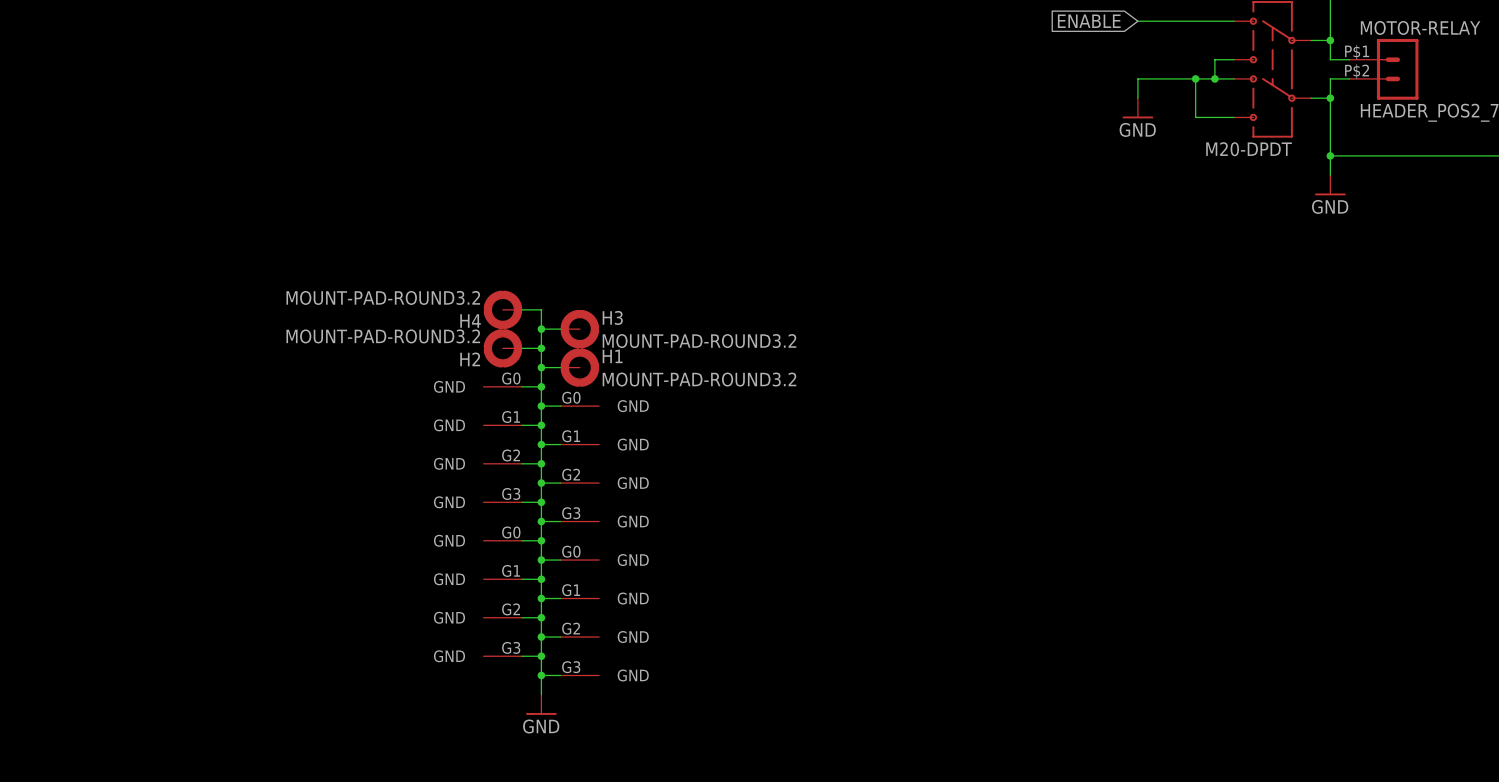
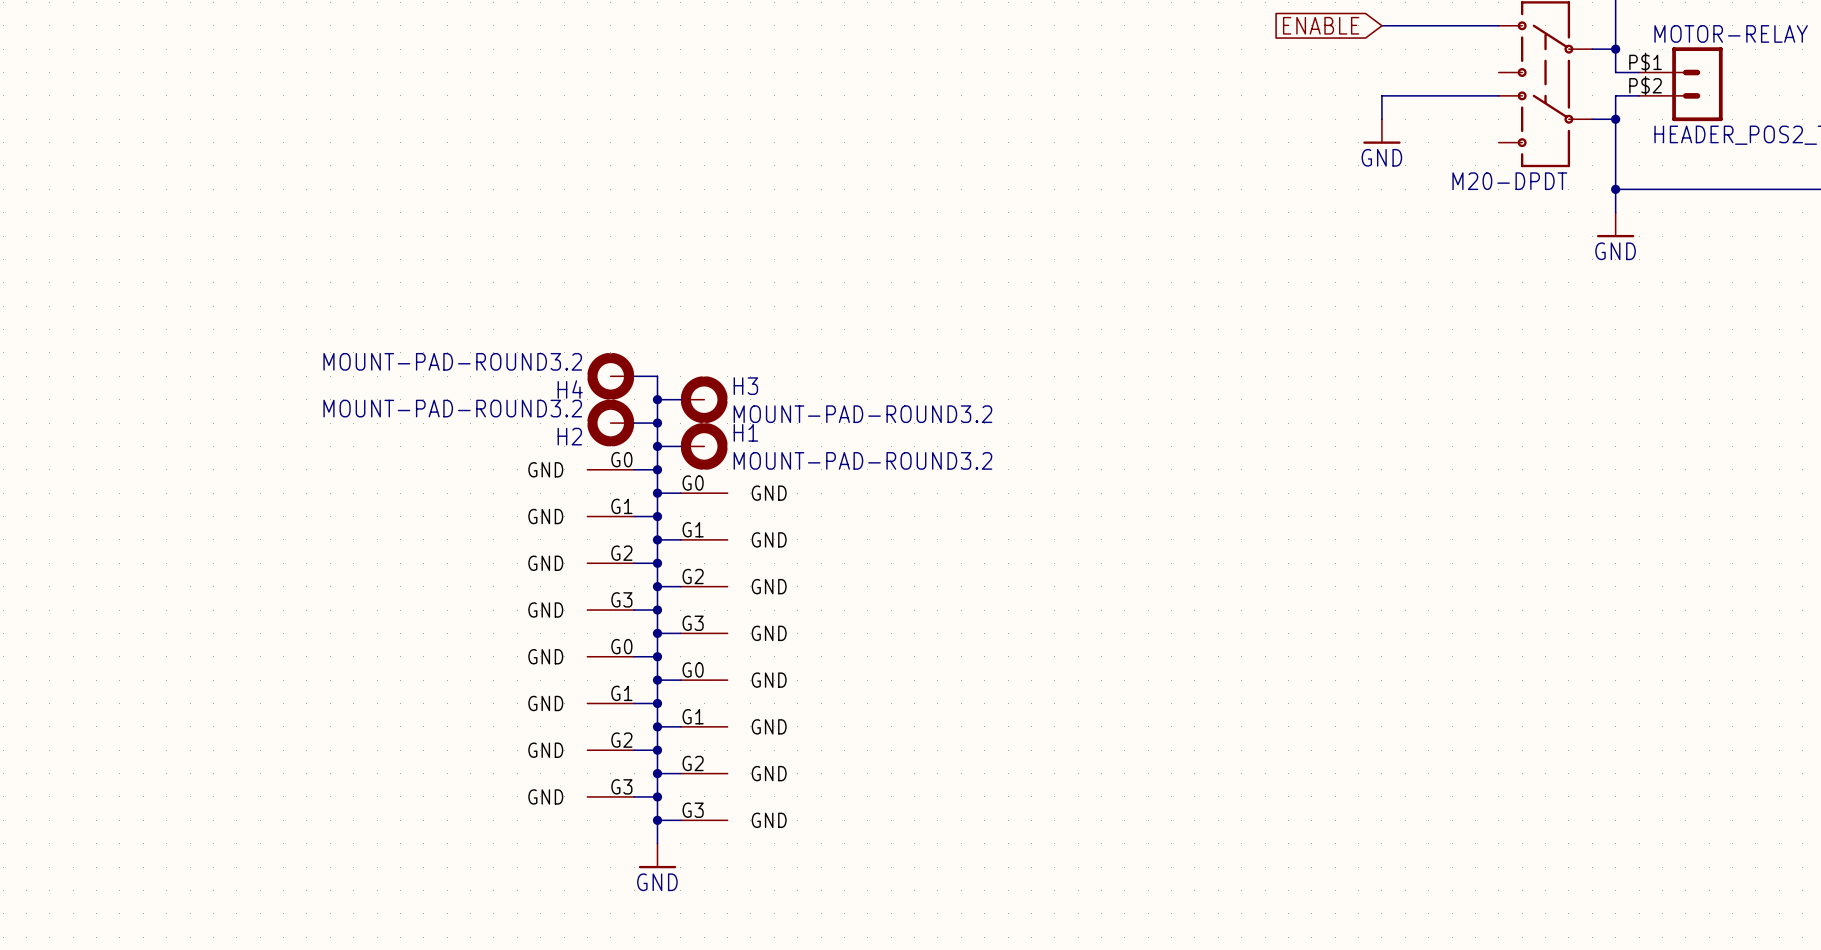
wire: (1234, 59) (1214, 59) (1214, 78) -> none
wire: (1195, 78) (1195, 117) (1234, 117) -> none
junction: (1195, 78) -> none
junction: (1214, 78) -> none

